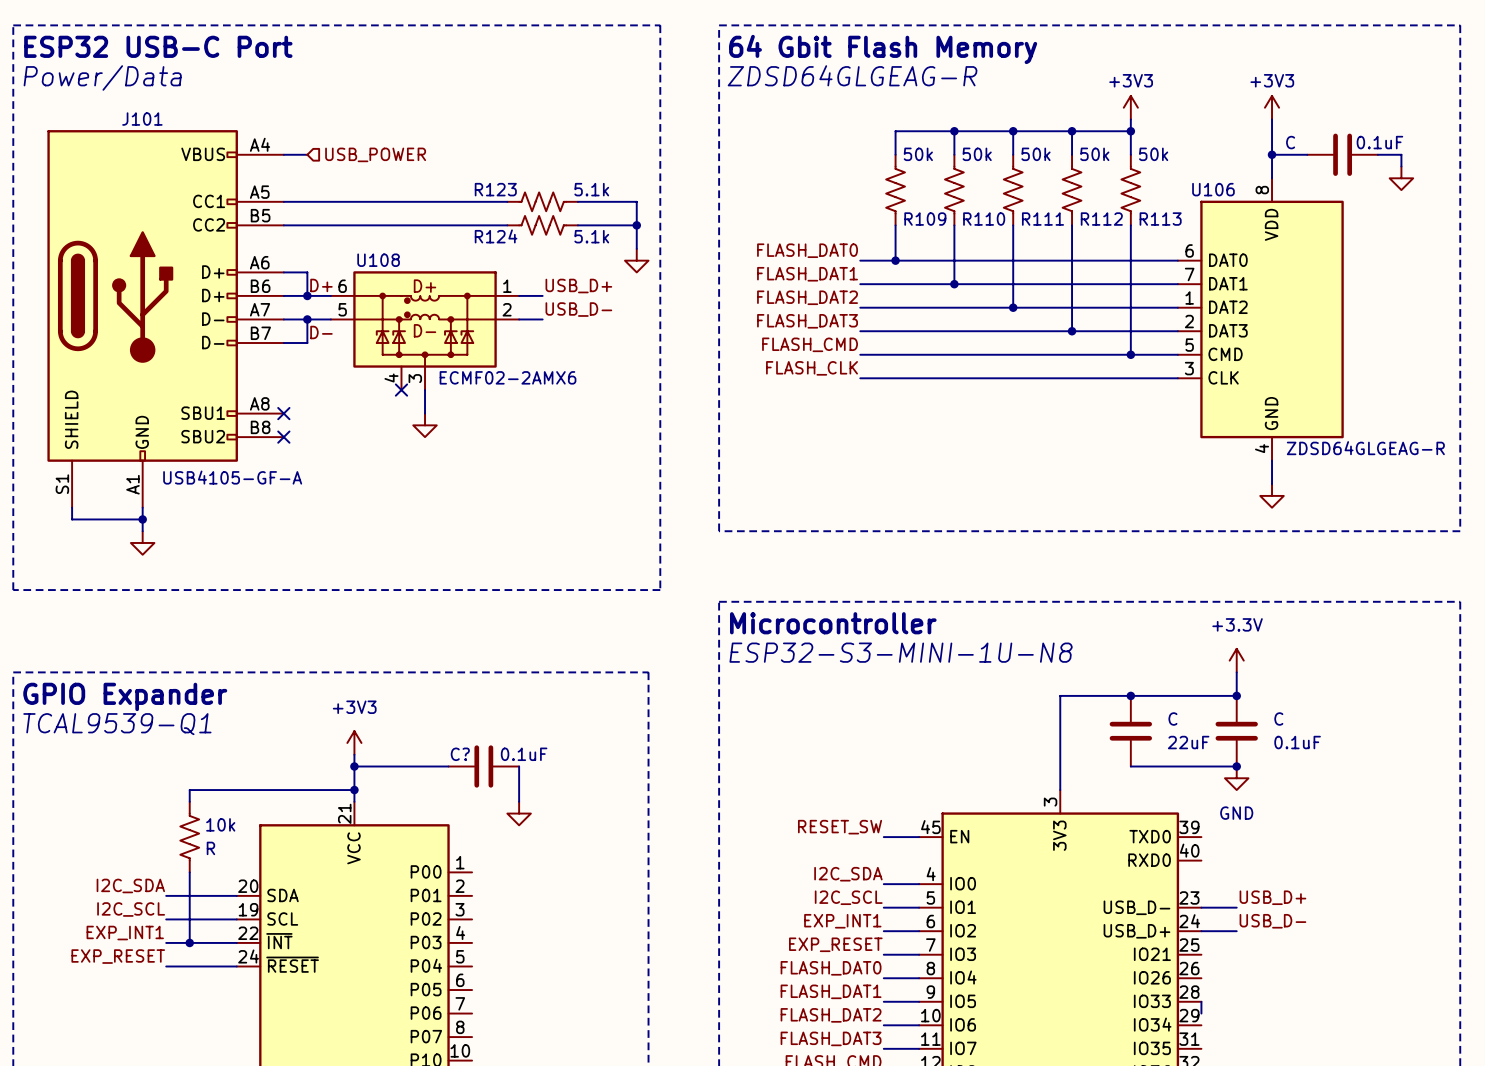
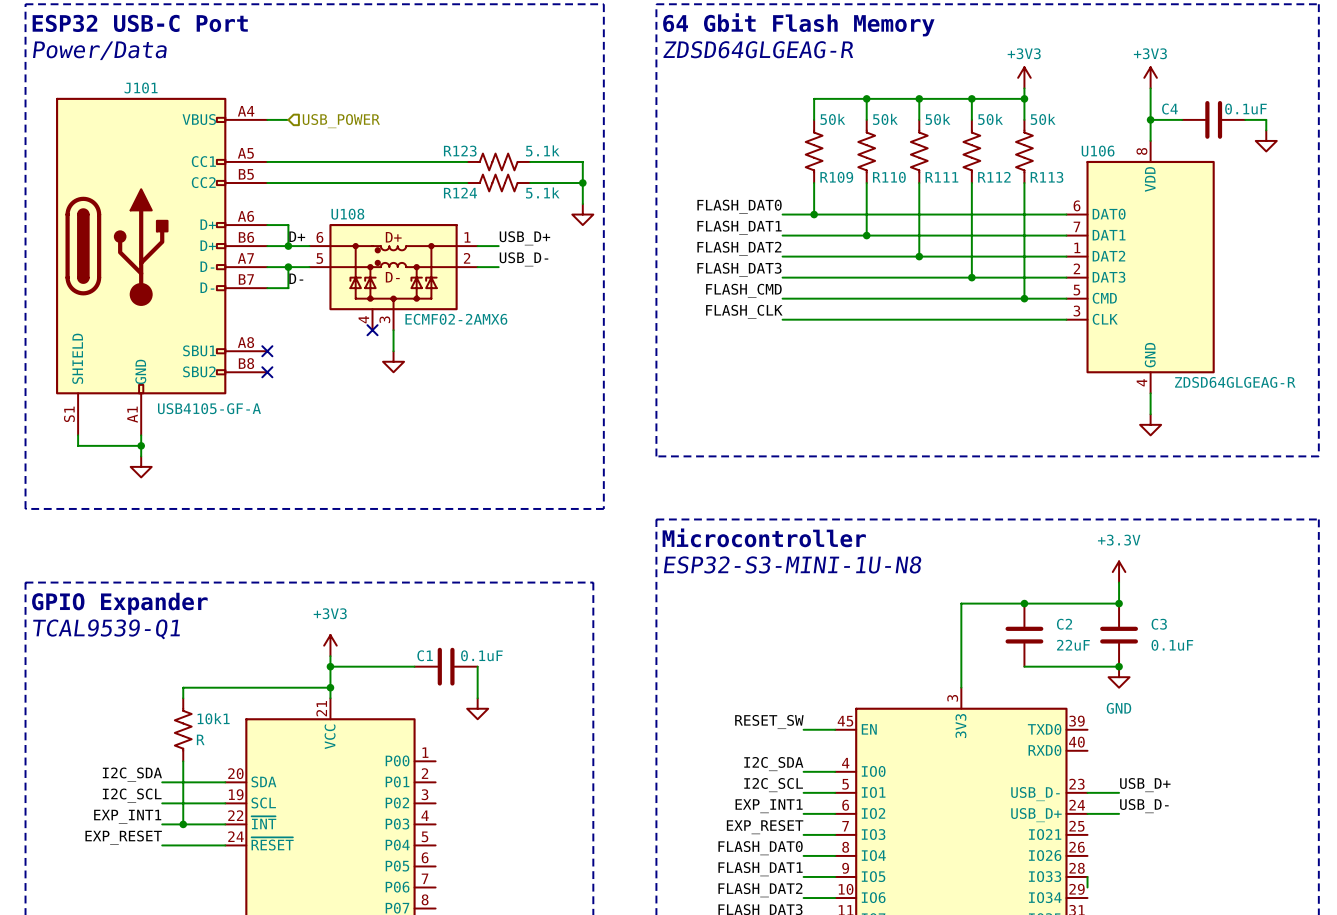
C name: C (1290, 142) -> C4 (1169, 109)
C name: C (1172, 719) -> C2 (1064, 624)
C name: C (1278, 719) -> C3 (1159, 624)
C? name: C? (460, 754) -> C1 (425, 655)
10k name: 10k (220, 824) -> 10k1 (213, 718)

